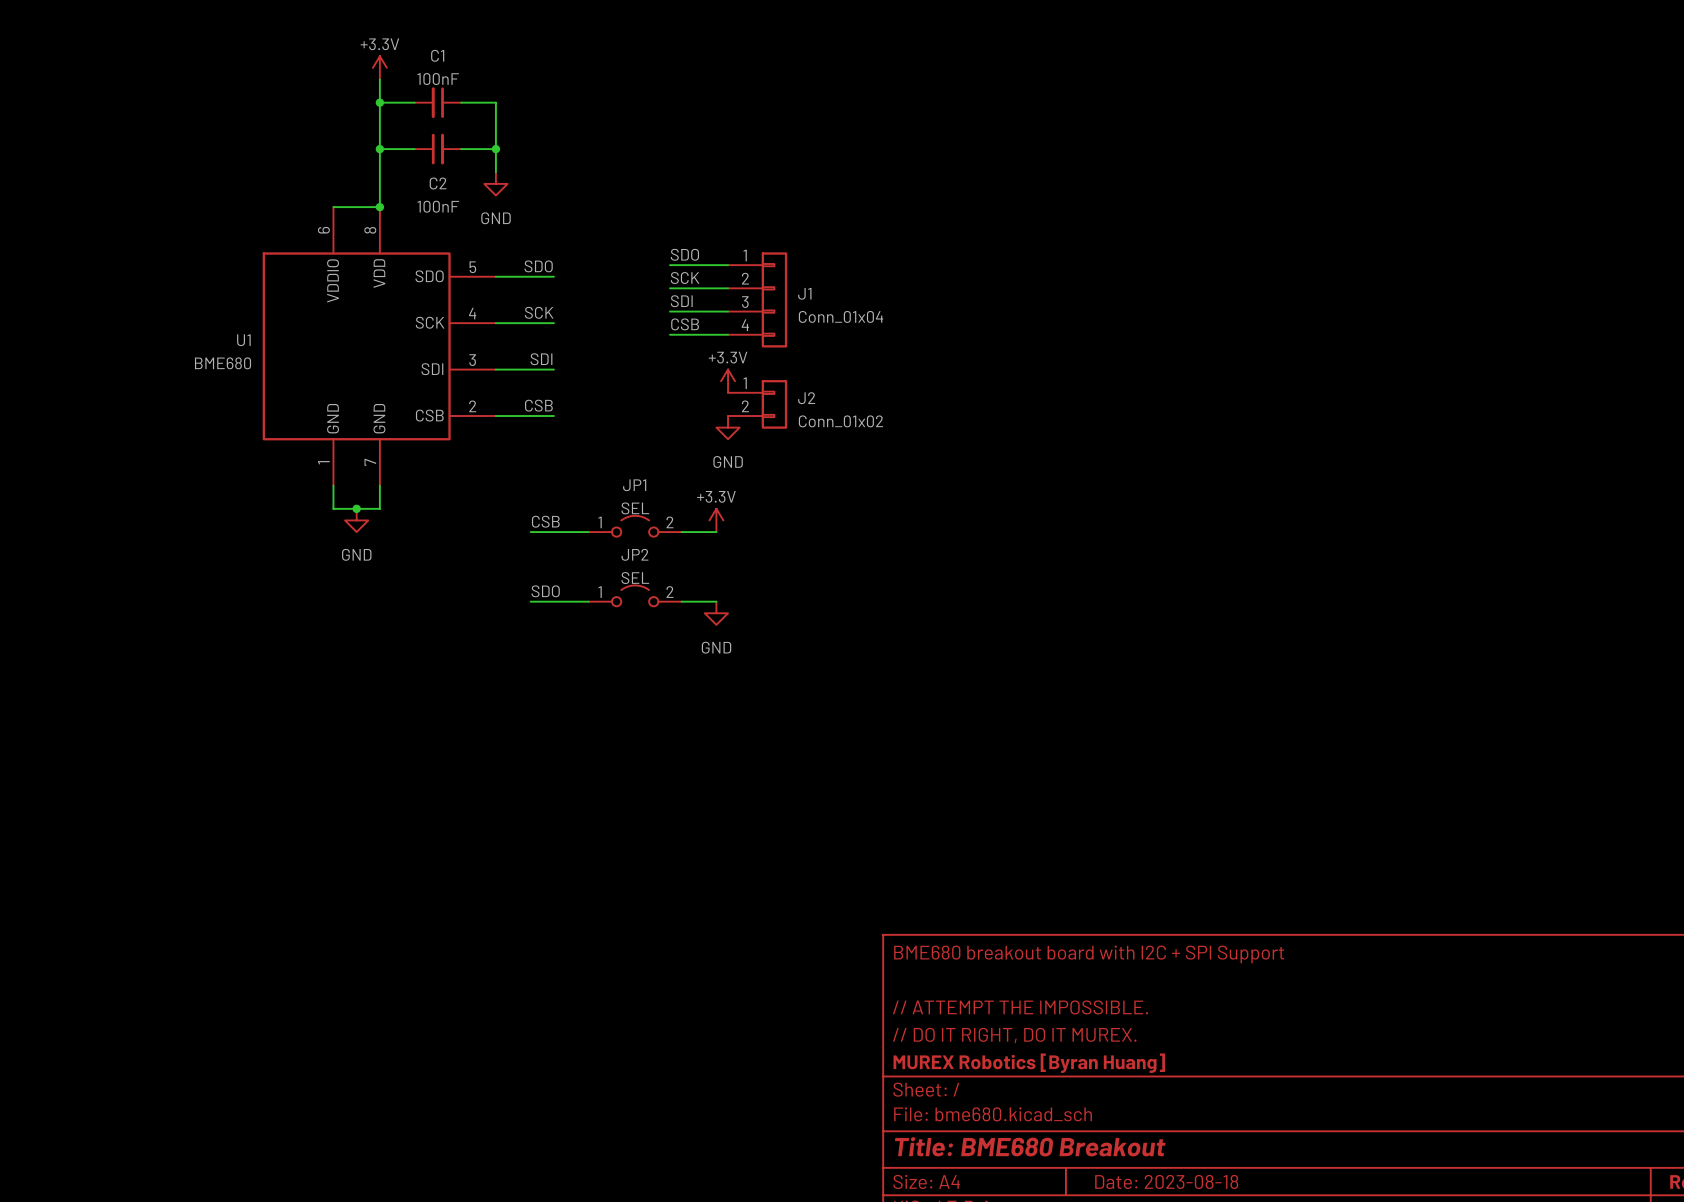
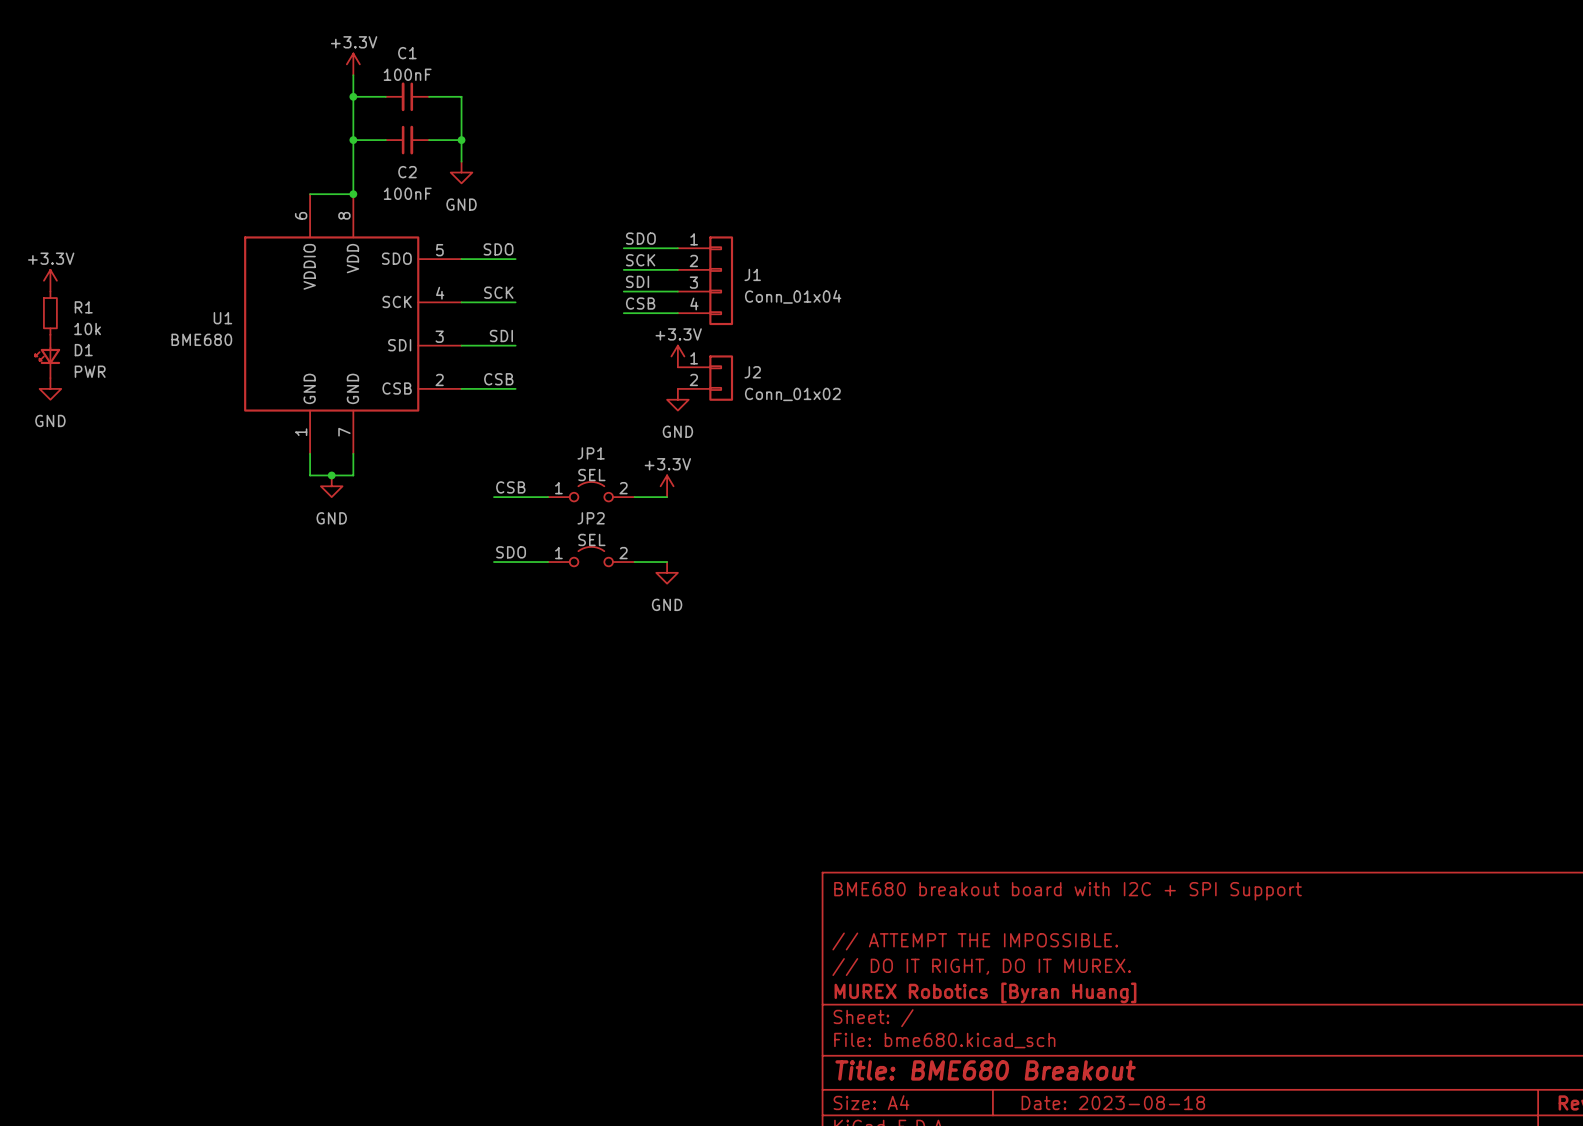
power symbol: none -> +3.3V (50, 280)
R1: none -> 10k (50, 313)
D1: none -> PWR (47, 356)
power symbol: none -> GND (50, 388)

